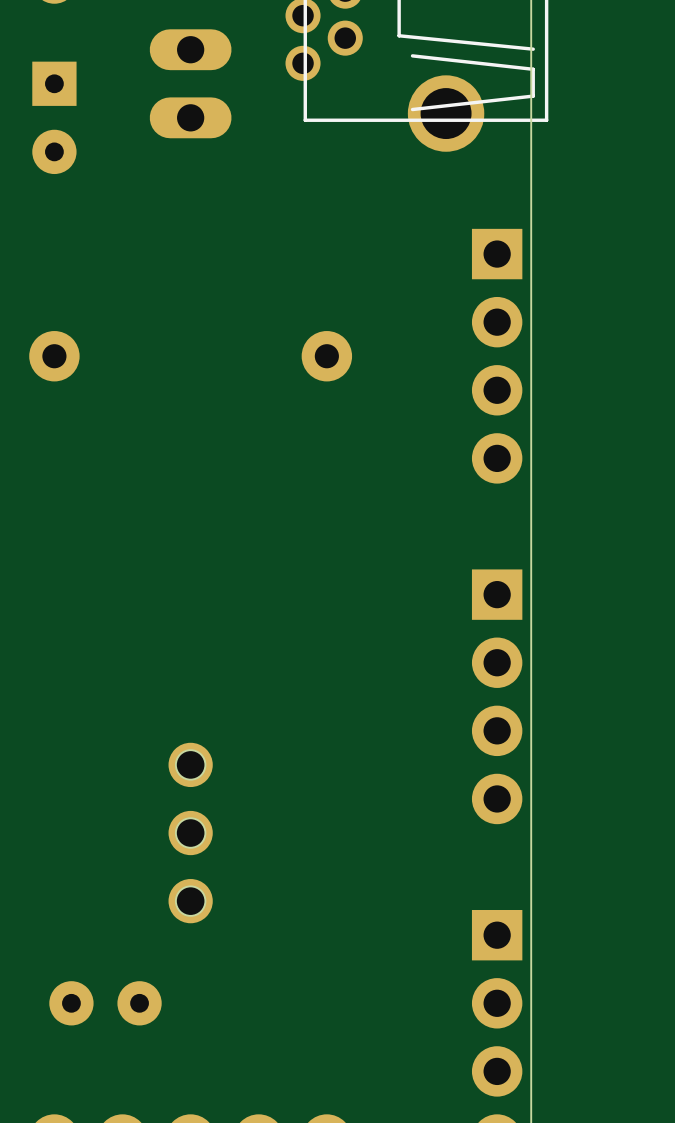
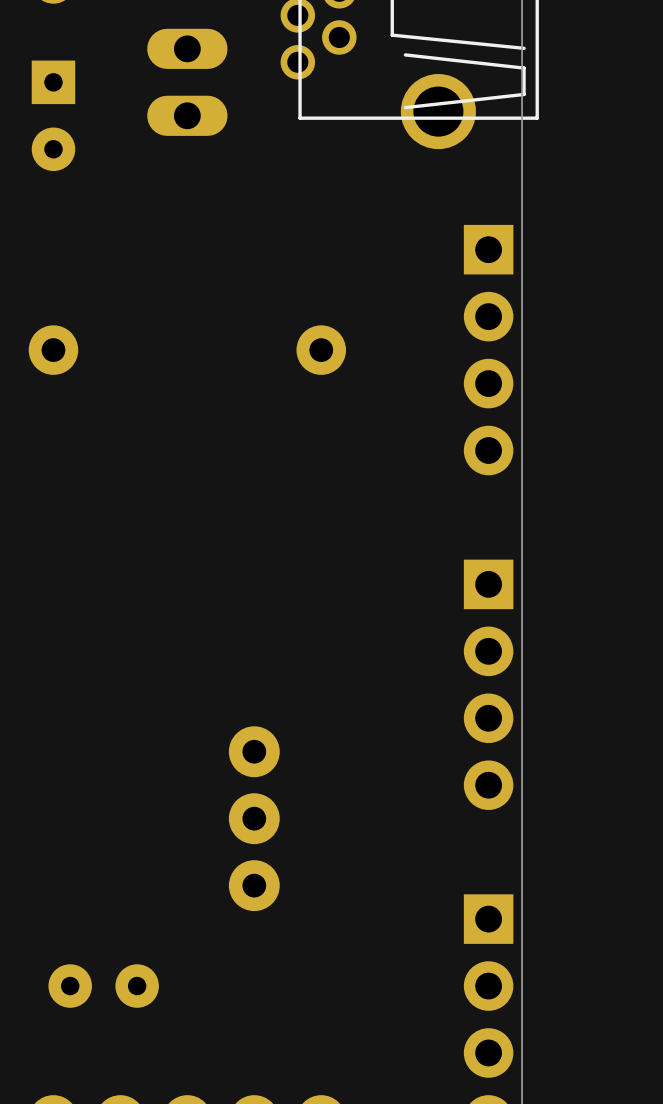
part: (190, 833) -> none
part: none -> (254, 818)

